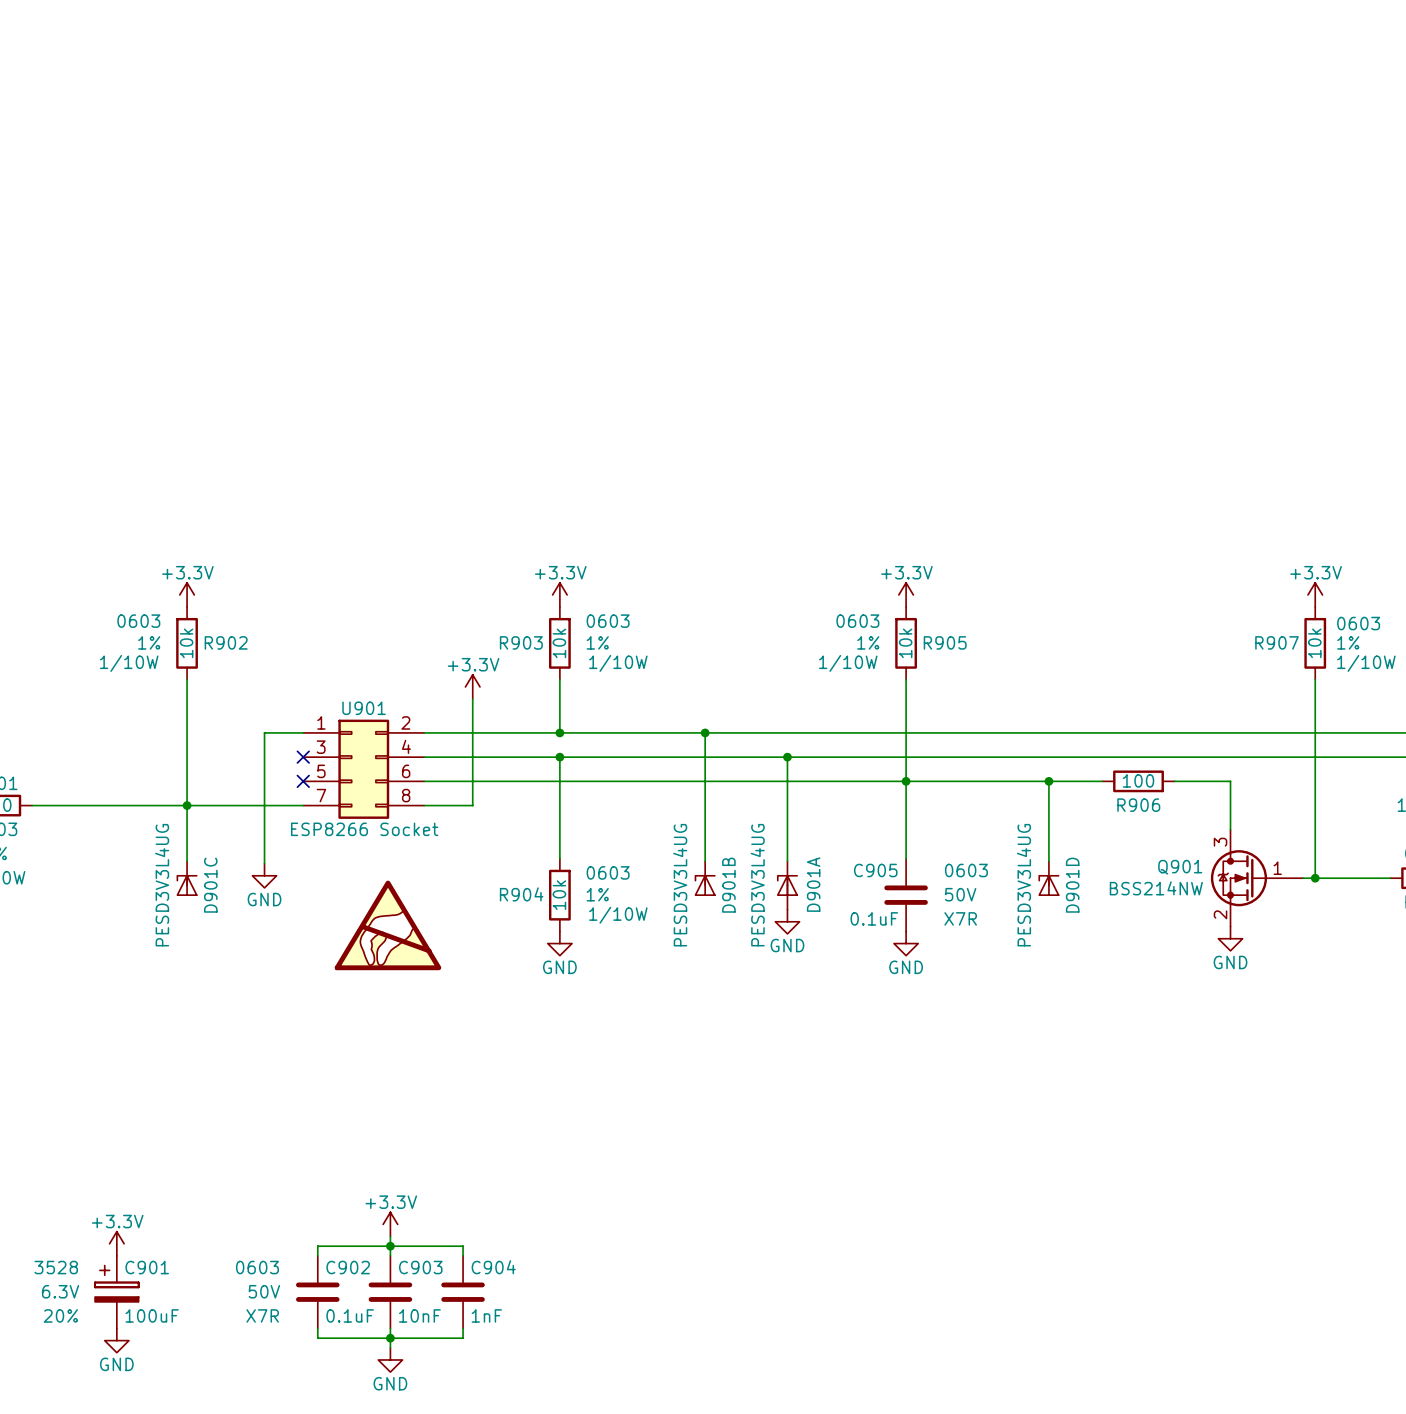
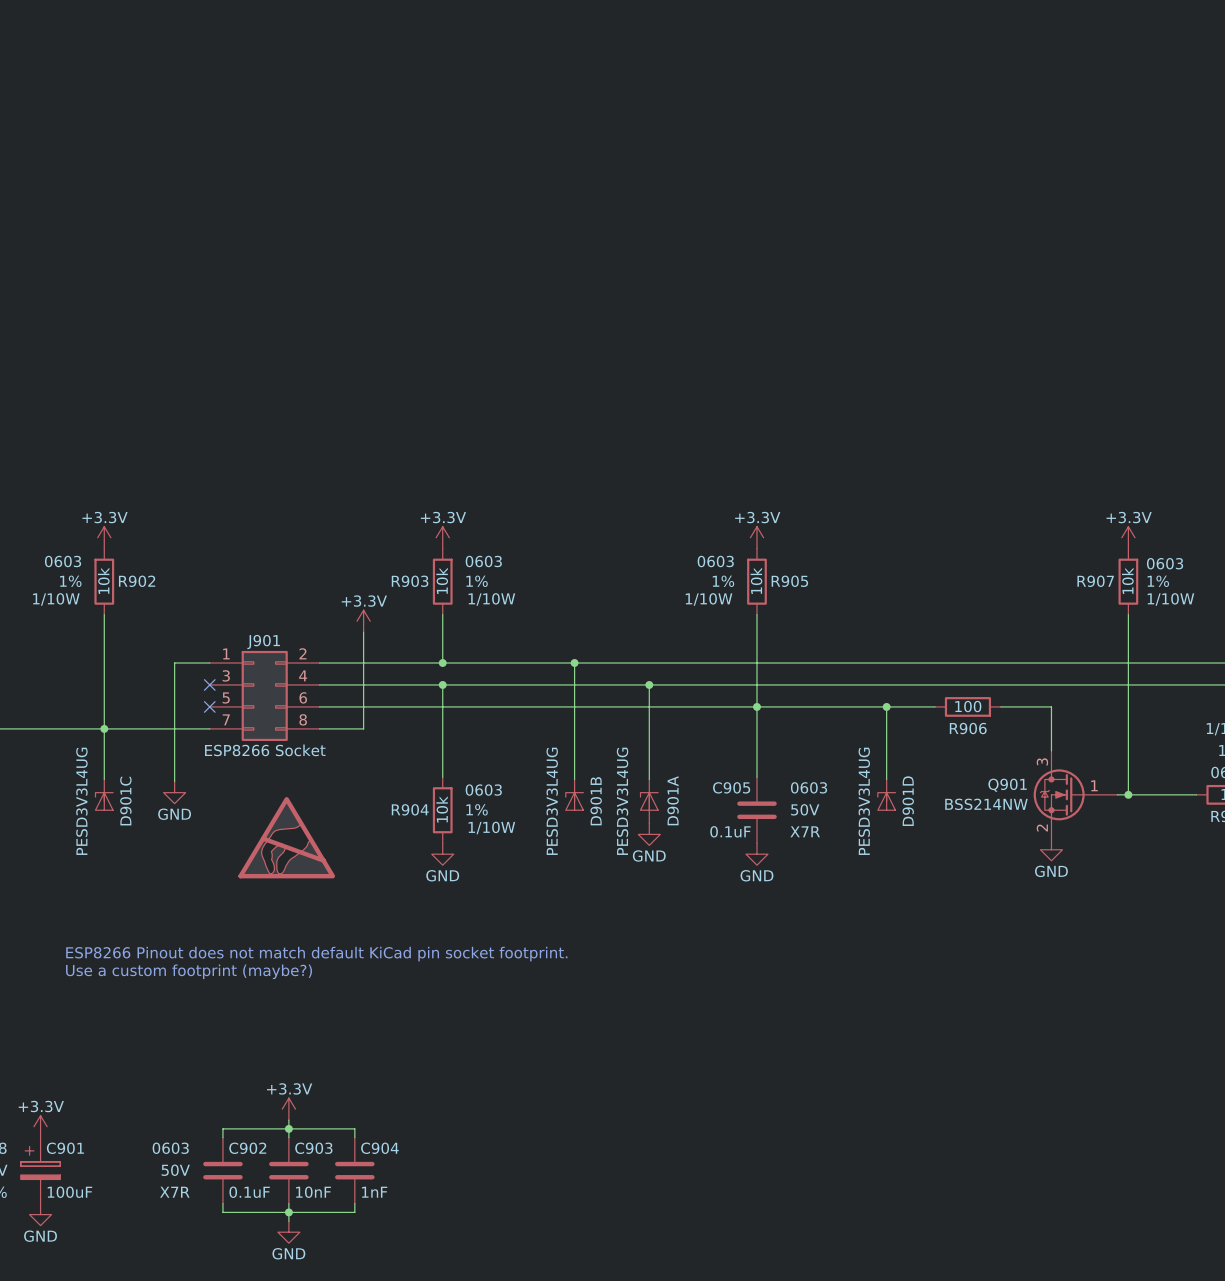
U901 name: U901 (364, 708) -> J901 (263, 642)
text: none -> ESP8266 Pinout does not match default KiCad pin socket footprint. (316, 954)
text: none -> Use a custom footprint (maybe?) (189, 971)

